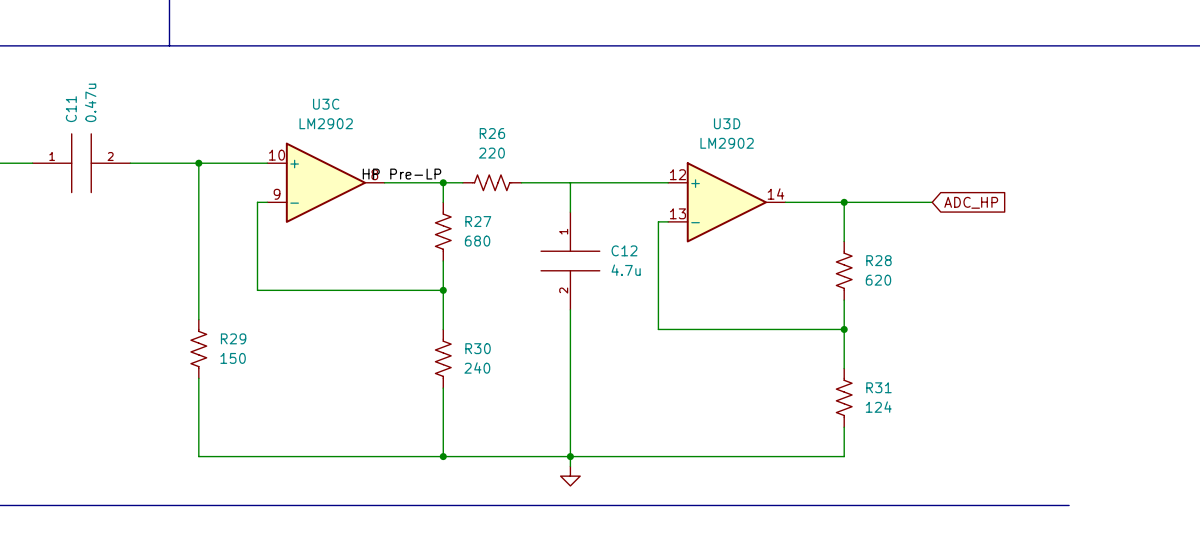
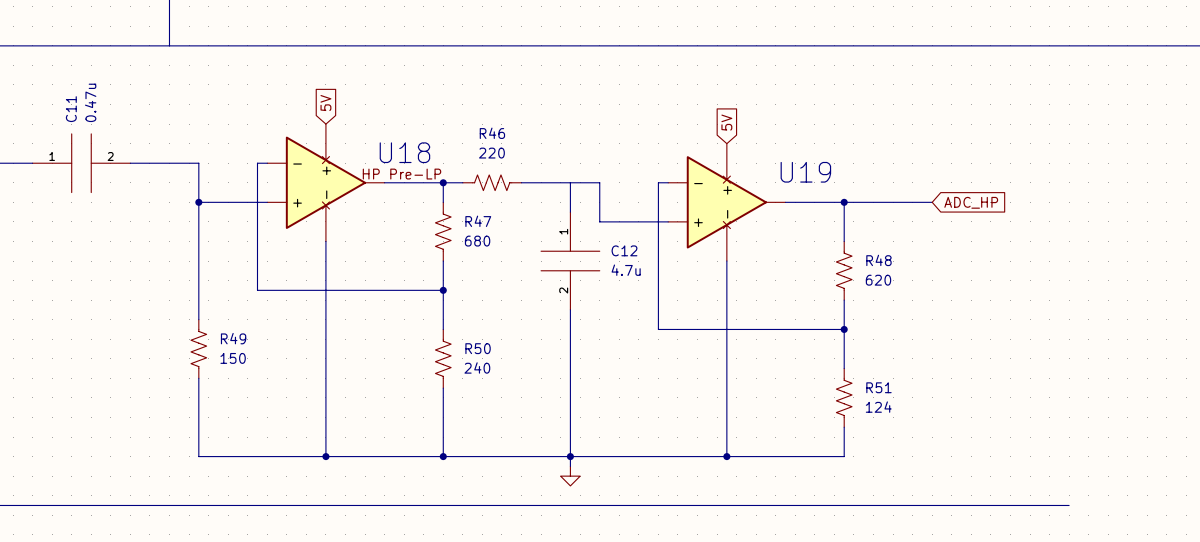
global label: none -> 5V (325, 103)
global label: none -> 5V (726, 122)
R26 name: R26 (492, 133) -> R46 (492, 133)
wire: (198, 163) (257, 163) -> (198, 202) (257, 202) (257, 163)
junction position: (198, 163) -> (198, 202)
U3C: LM2902 (325, 182) -> none
U18: none -> (325, 182)
wire: (599, 182) (658, 182) -> (599, 182) (599, 221) (658, 221) (658, 182)
U3D: LM2902 (726, 202) -> none
U19: none -> (726, 202)
R27 name: R27 (478, 221) -> R47 (478, 221)
wire: none -> (325, 241) (325, 456)
R28 name: R28 (878, 260) -> R48 (878, 260)
wire: none -> (726, 261) (726, 456)
R29 name: R29 (233, 338) -> R49 (233, 338)
R30 name: R30 (478, 348) -> R50 (478, 348)
R31 name: R31 (878, 387) -> R51 (878, 387)
junction: none -> (325, 456)
junction: none -> (726, 456)

